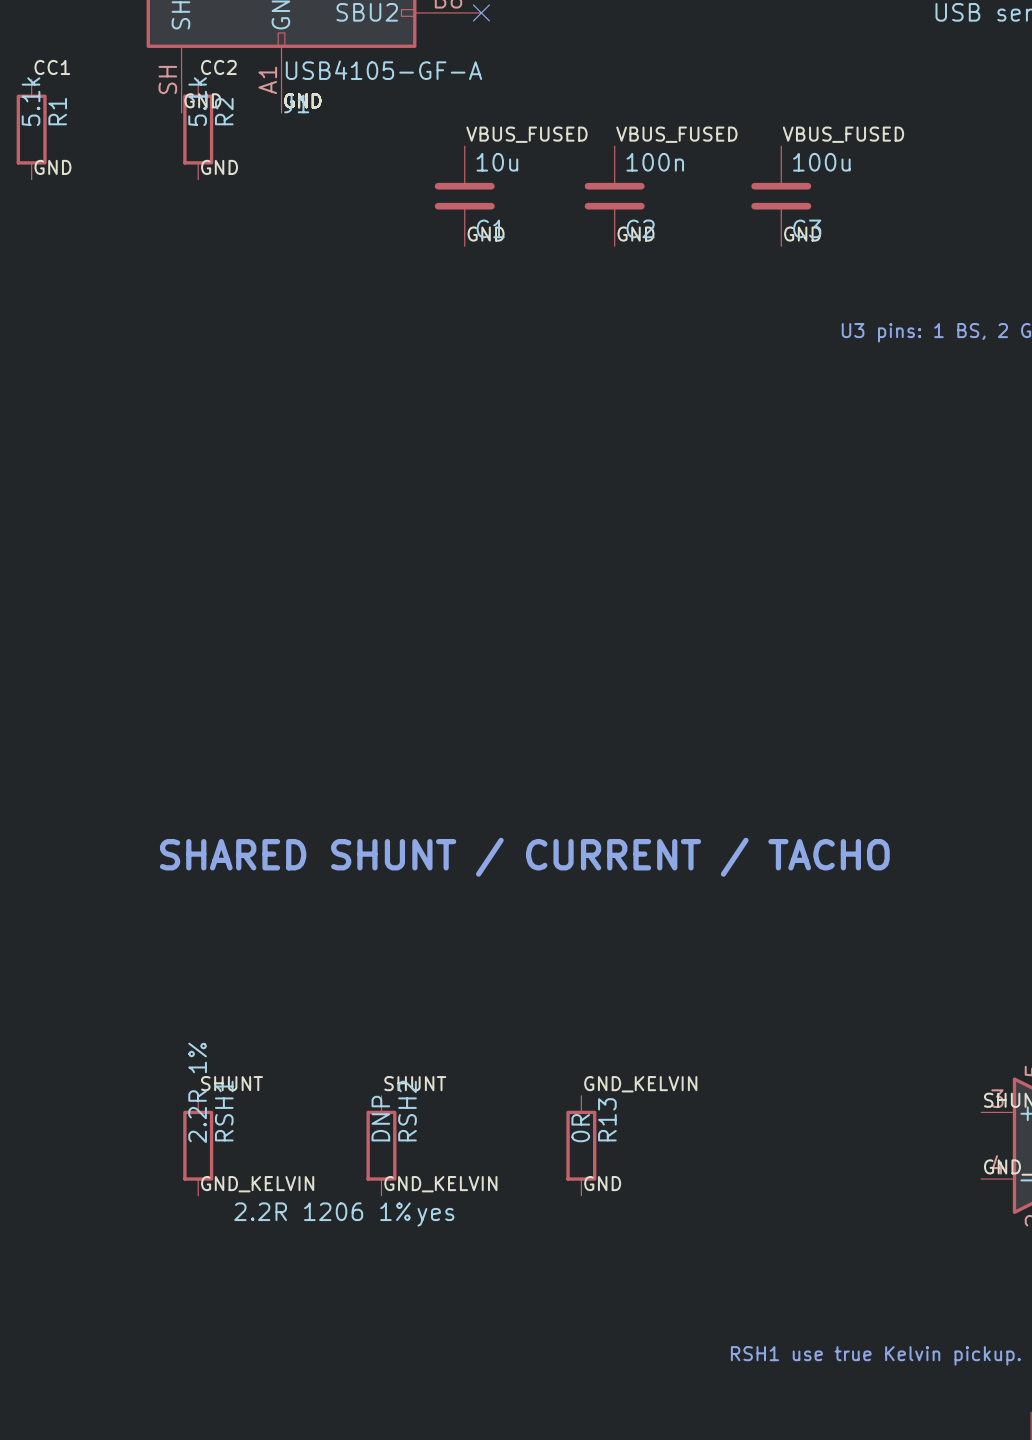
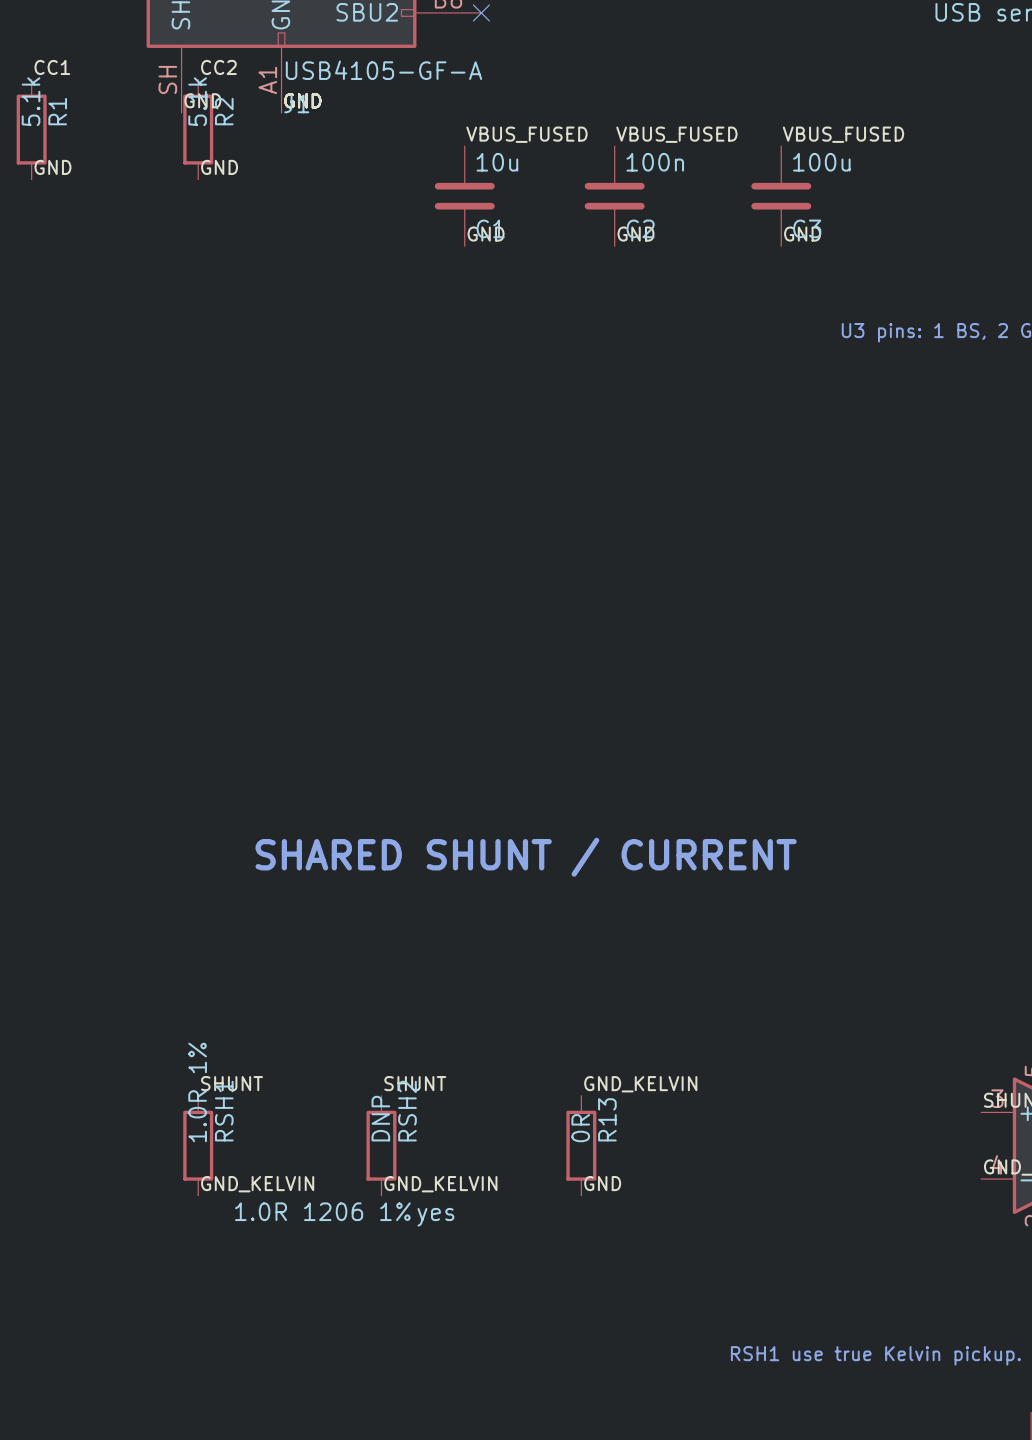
text: SHARED SHUNT / CURRENT / TACHO (524, 857) -> SHARED SHUNT / CURRENT (526, 857)
RSH1 value: 2.2R 1% (197, 1092) -> 1.0R 1% (197, 1092)
RSH1 text: 2.2R 1206 1% (322, 1211) -> 1.0R 1206 1% (322, 1211)

